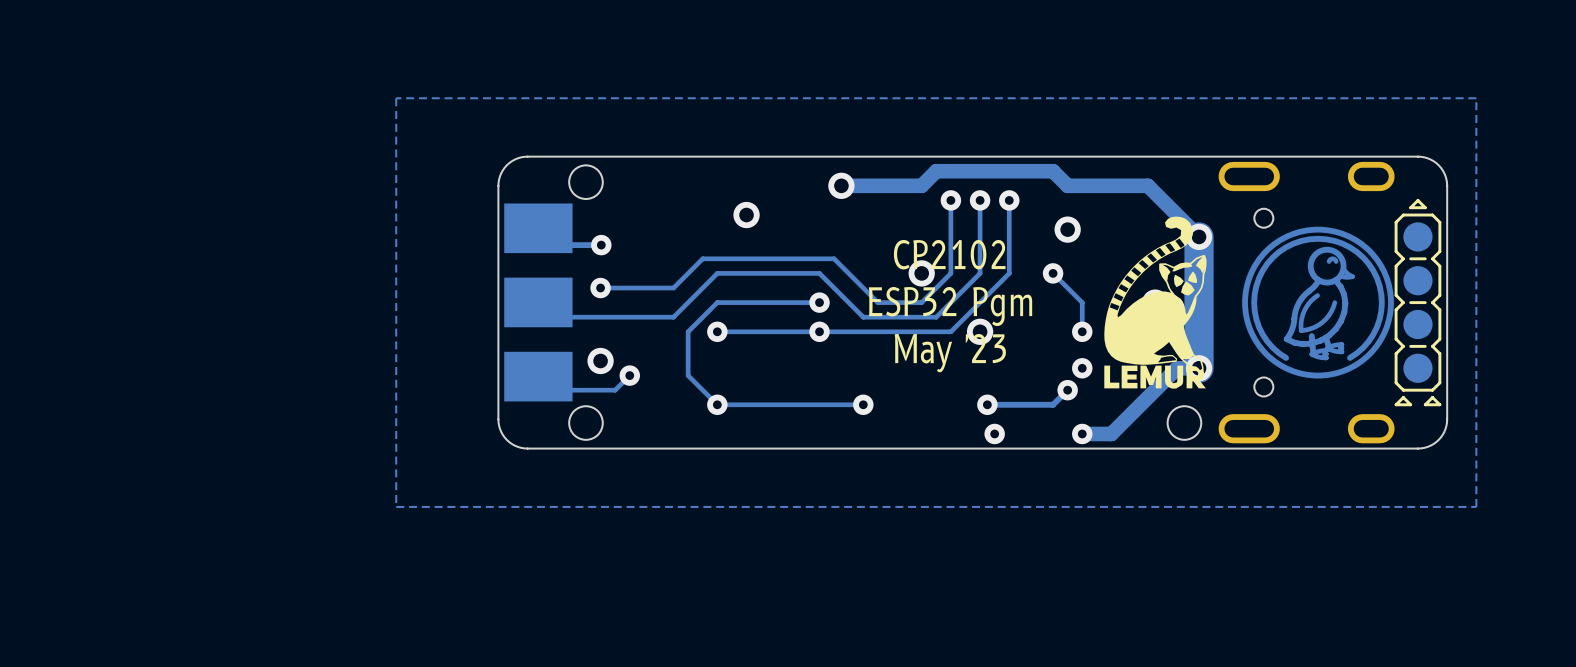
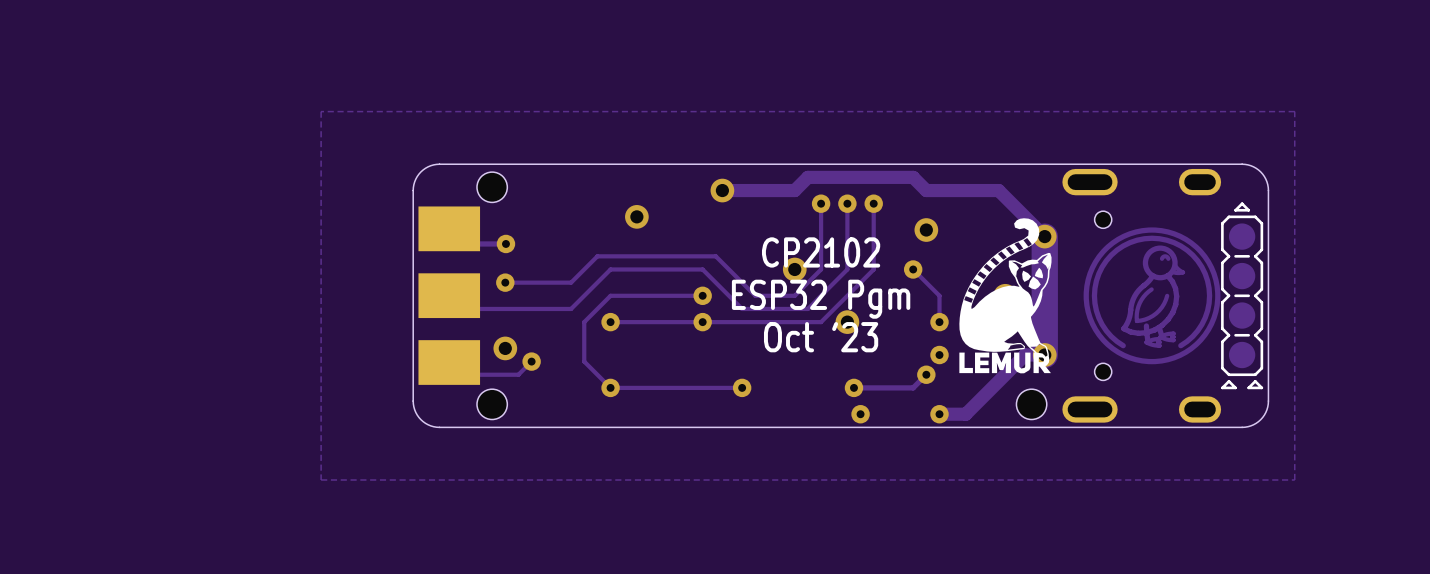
text: May '23 (950, 353) -> Oct '23 (821, 337)

